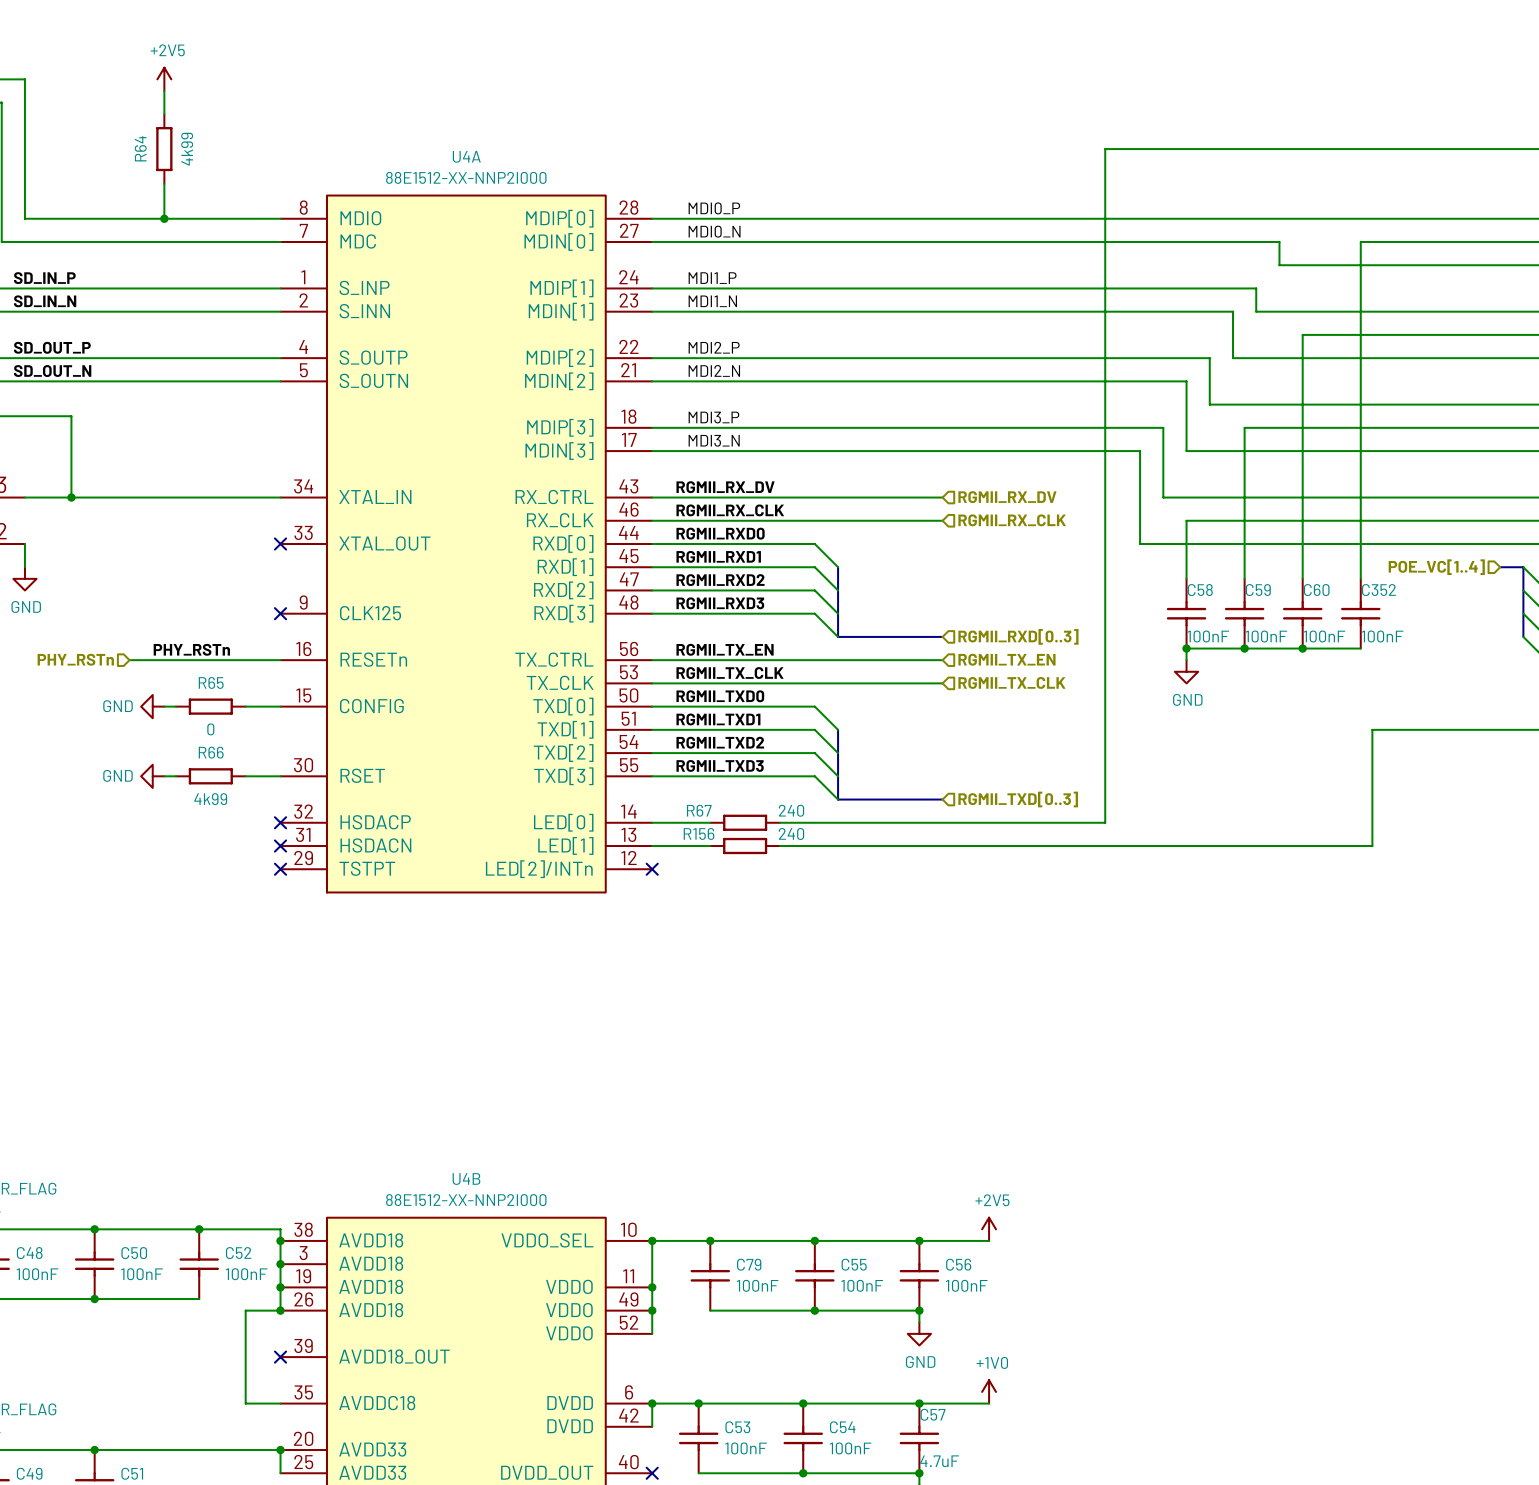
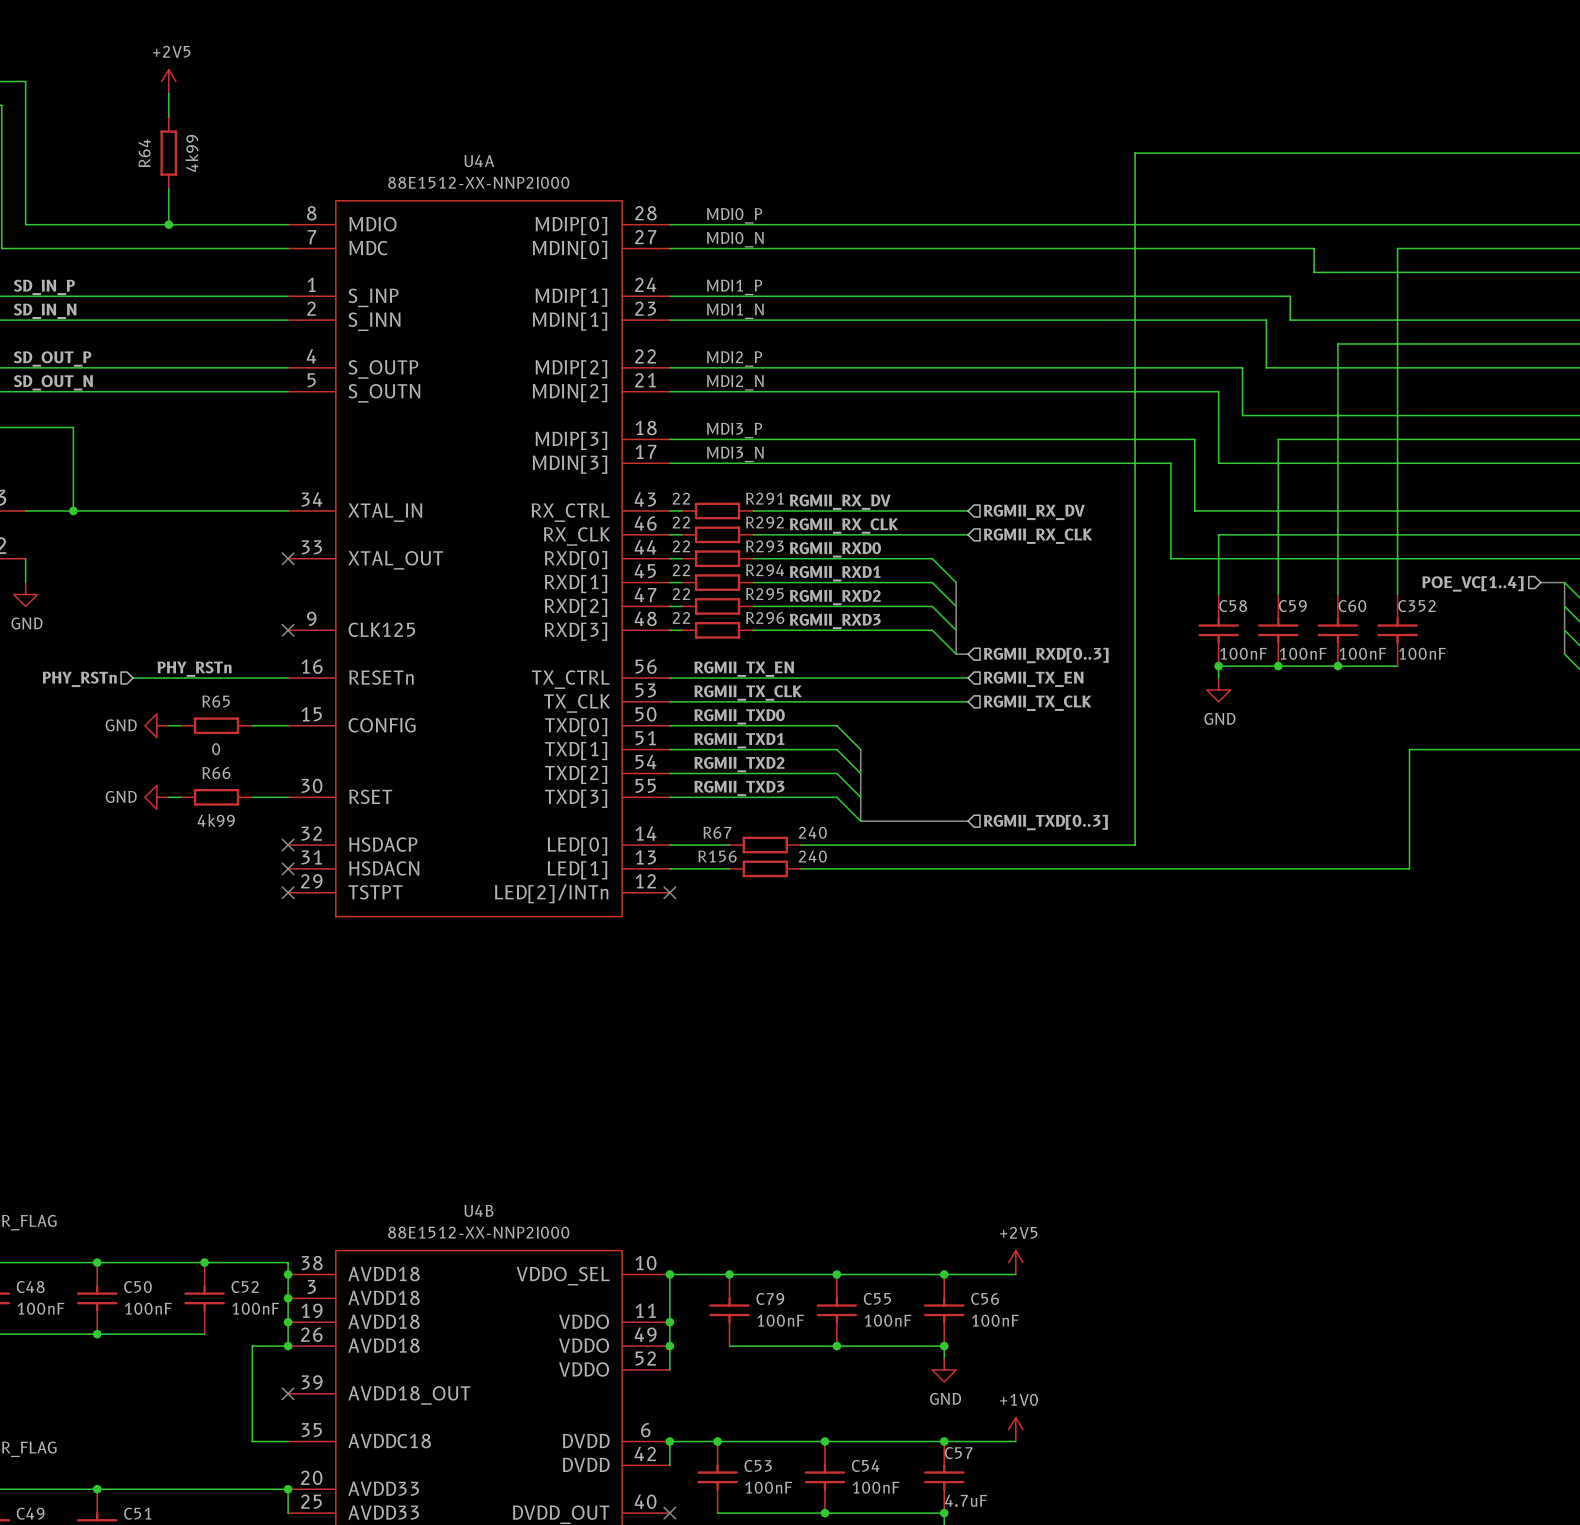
label position: RGMII_RX_DV (725, 487) -> RGMII_RX_DV (840, 502)
wire: (663, 497) (733, 497) -> none
R291: none -> (717, 510)
label position: RGMII_RX_CLK (730, 510) -> RGMII_RX_CLK (843, 525)
wire: (663, 520) (733, 520) -> none
R292: none -> (717, 534)
label position: RGMII_RXD0 (720, 533) -> RGMII_RXD0 (835, 549)
wire: (663, 544) (733, 544) -> none
R293: none -> (717, 558)
wire: (814, 544) (838, 567) -> (836, 558) (932, 558) (956, 582)
label position: RGMII_RXD1 (718, 556) -> RGMII_RXD1 (835, 573)
wire: (663, 567) (733, 567) -> none
R294: none -> (717, 582)
wire: (814, 567) (838, 590) -> (836, 582) (932, 582) (956, 606)
bus: (838, 567) (838, 636) (930, 636) -> (956, 582) (956, 654)
label position: RGMII_RXD2 (720, 580) -> RGMII_RXD2 (835, 597)
wire: (663, 590) (733, 590) -> none
R295: none -> (717, 606)
wire: (814, 590) (838, 613) -> (836, 606) (932, 606) (956, 630)
label position: RGMII_RXD3 (720, 603) -> RGMII_RXD3 (835, 621)
wire: (663, 613) (733, 613) -> none
R296: none -> (717, 630)
wire: (814, 613) (838, 636) -> (836, 630) (932, 630) (956, 654)

